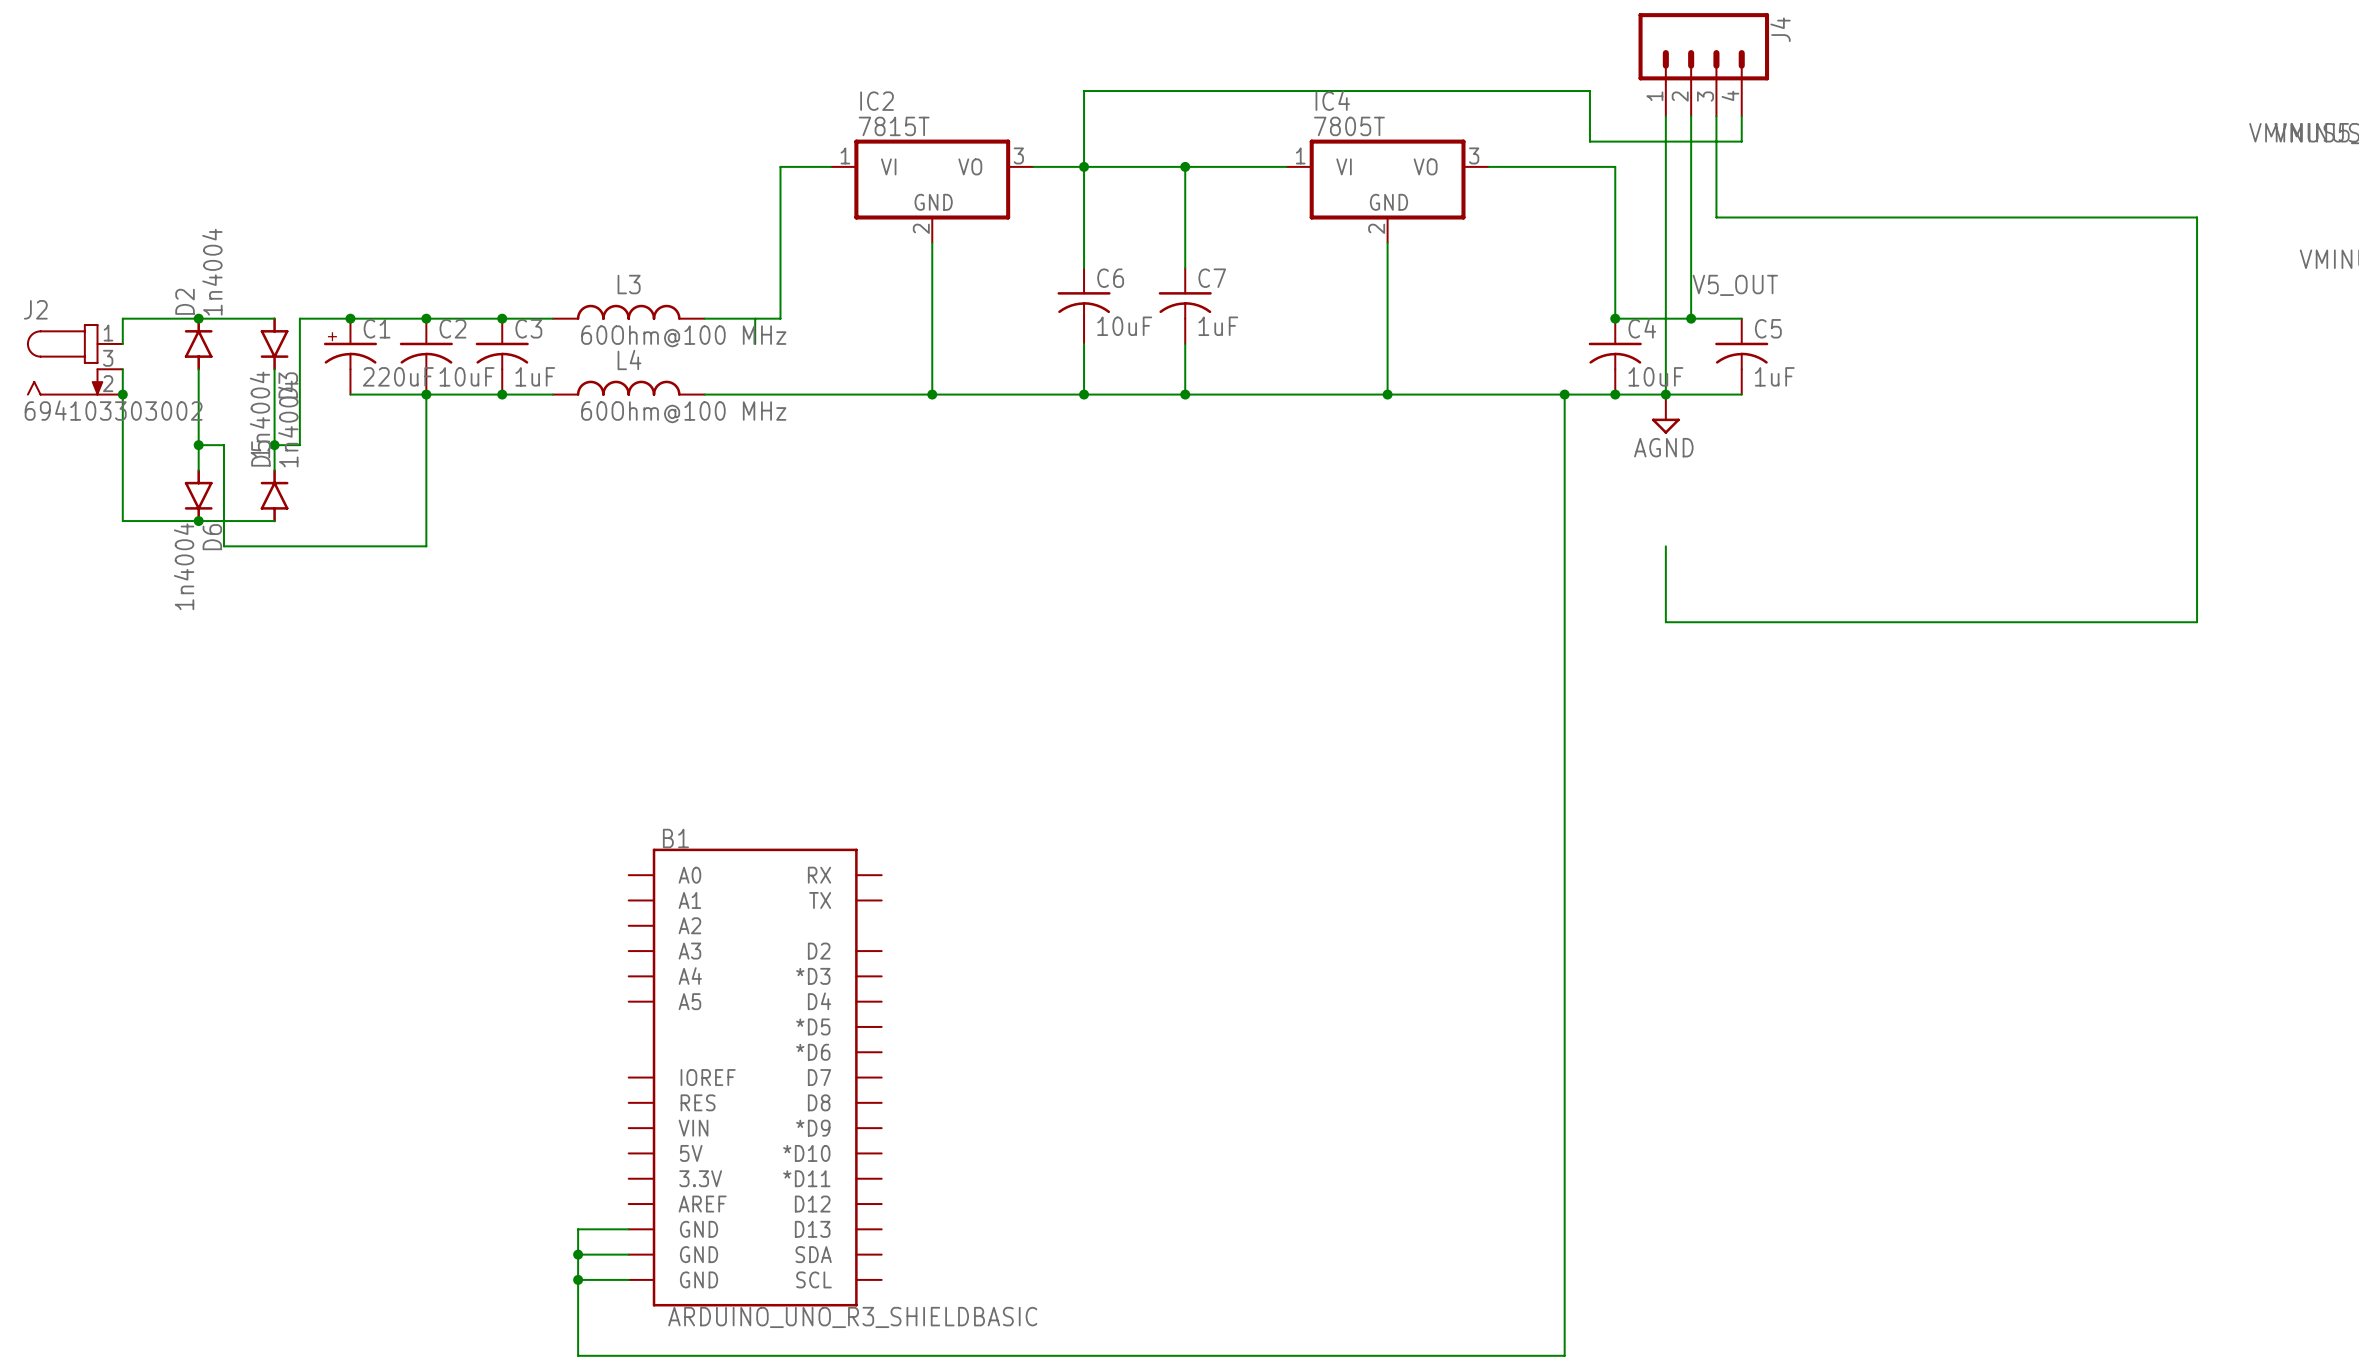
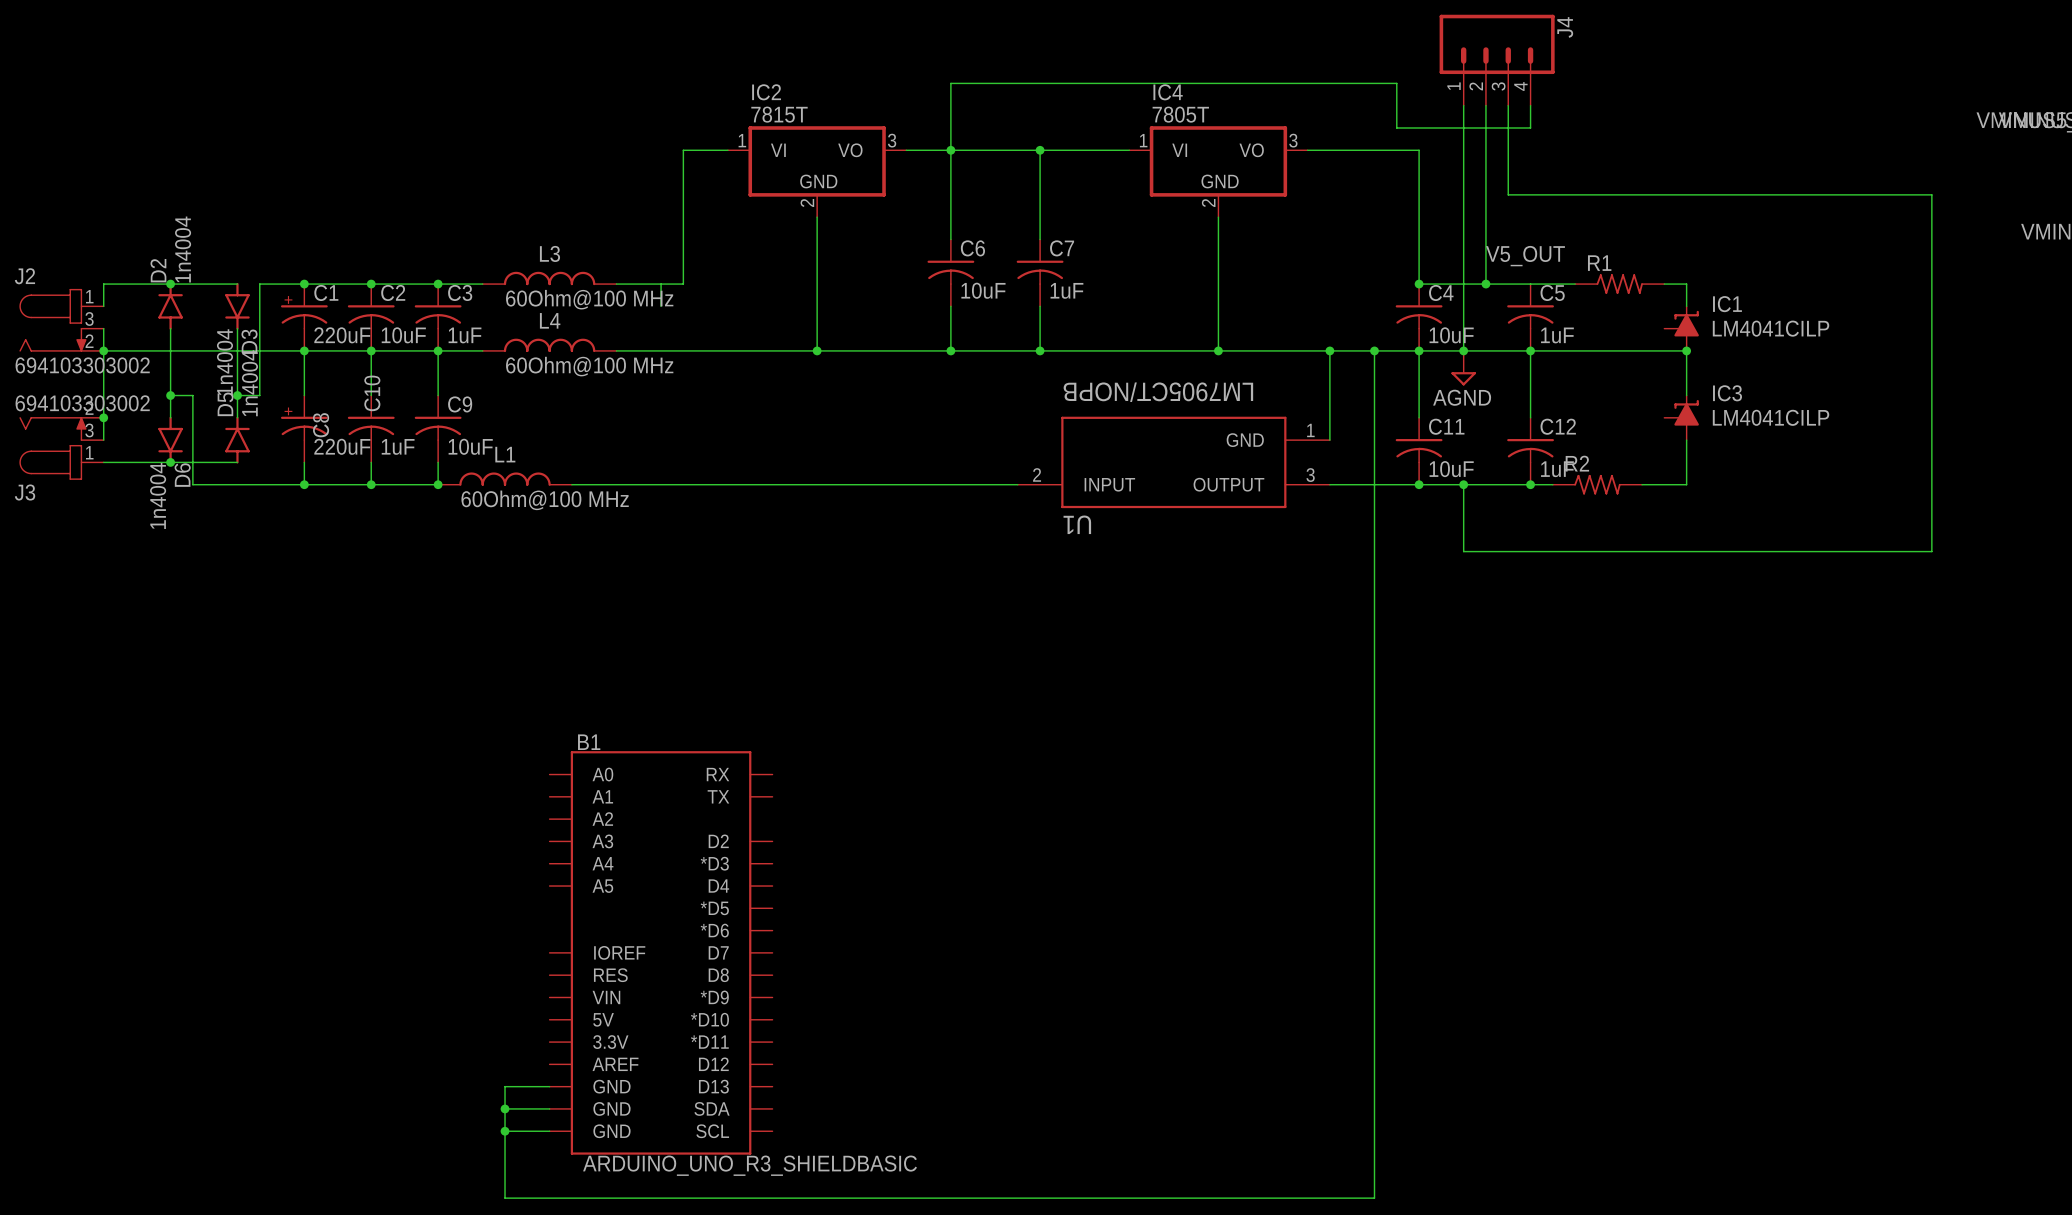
wire: none -> (1530, 284) (1575, 284)
R1: none -> (1619, 284)
wire: none -> (1664, 284) (1686, 284) (1686, 306)
IC1: none -> LM4041CILP (1681, 328)
wire: none -> (103, 350) (304, 350) (304, 395)
junction: none -> (304, 350)
wire: none -> (438, 350) (438, 395)
wire: none -> (1329, 350) (1329, 440)
junction: none -> (1329, 350)
wire: none -> (1419, 350) (1419, 417)
junction: none -> (1530, 350)
junction: none -> (1686, 350)
wire: none -> (1686, 395) (1686, 350) (1530, 350) (1530, 417)
junction: none -> (103, 417)
IC3: none -> LM4041CILP (1681, 417)
C8: none -> 220uF (304, 428)
C10: none -> 1uF (371, 428)
C9: none -> 10uF (438, 428)
wire: (122, 495) (122, 521) -> (304, 462) (304, 484)
wire: none -> (1686, 440) (1686, 484) (1642, 484)
J3: none -> 694103303002 (61, 448)
C11: none -> 10uF (1419, 451)
C12: none -> 1uF (1530, 451)
wire: none -> (438, 462) (438, 484) (371, 484)
U1: none -> LM7905CT/NOPB (1173, 462)
L1: none -> 60Ohm@100 MHz (505, 479)
junction: none -> (304, 484)
junction: none -> (371, 484)
junction: none -> (438, 484)
wire: none -> (571, 484) (1017, 484)
wire: none -> (1329, 484) (1552, 484)
junction: none -> (1419, 484)
junction: none -> (1463, 484)
junction: none -> (1530, 484)
R2: none -> (1597, 484)

